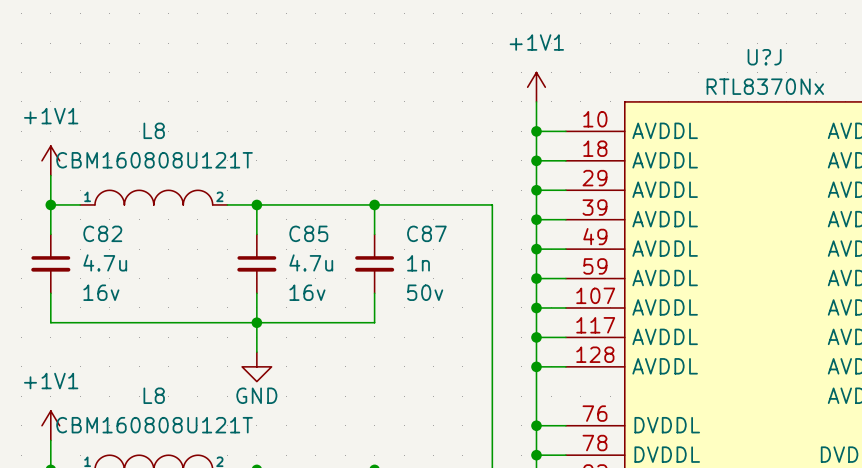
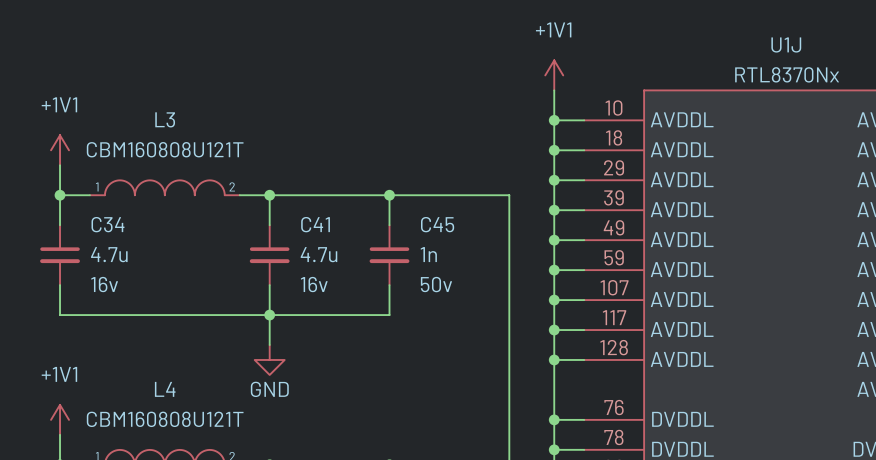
U?J name: U?J (764, 57) -> U1J (786, 44)
L8 name: L8 (154, 130) -> L3 (165, 119)
C82 name: C82 (102, 233) -> C34 (107, 224)
C85 name: C85 (308, 233) -> C41 (315, 224)
C87 name: C87 (426, 233) -> C45 (437, 224)
L8 name: L8 (154, 395) -> L4 (165, 389)

